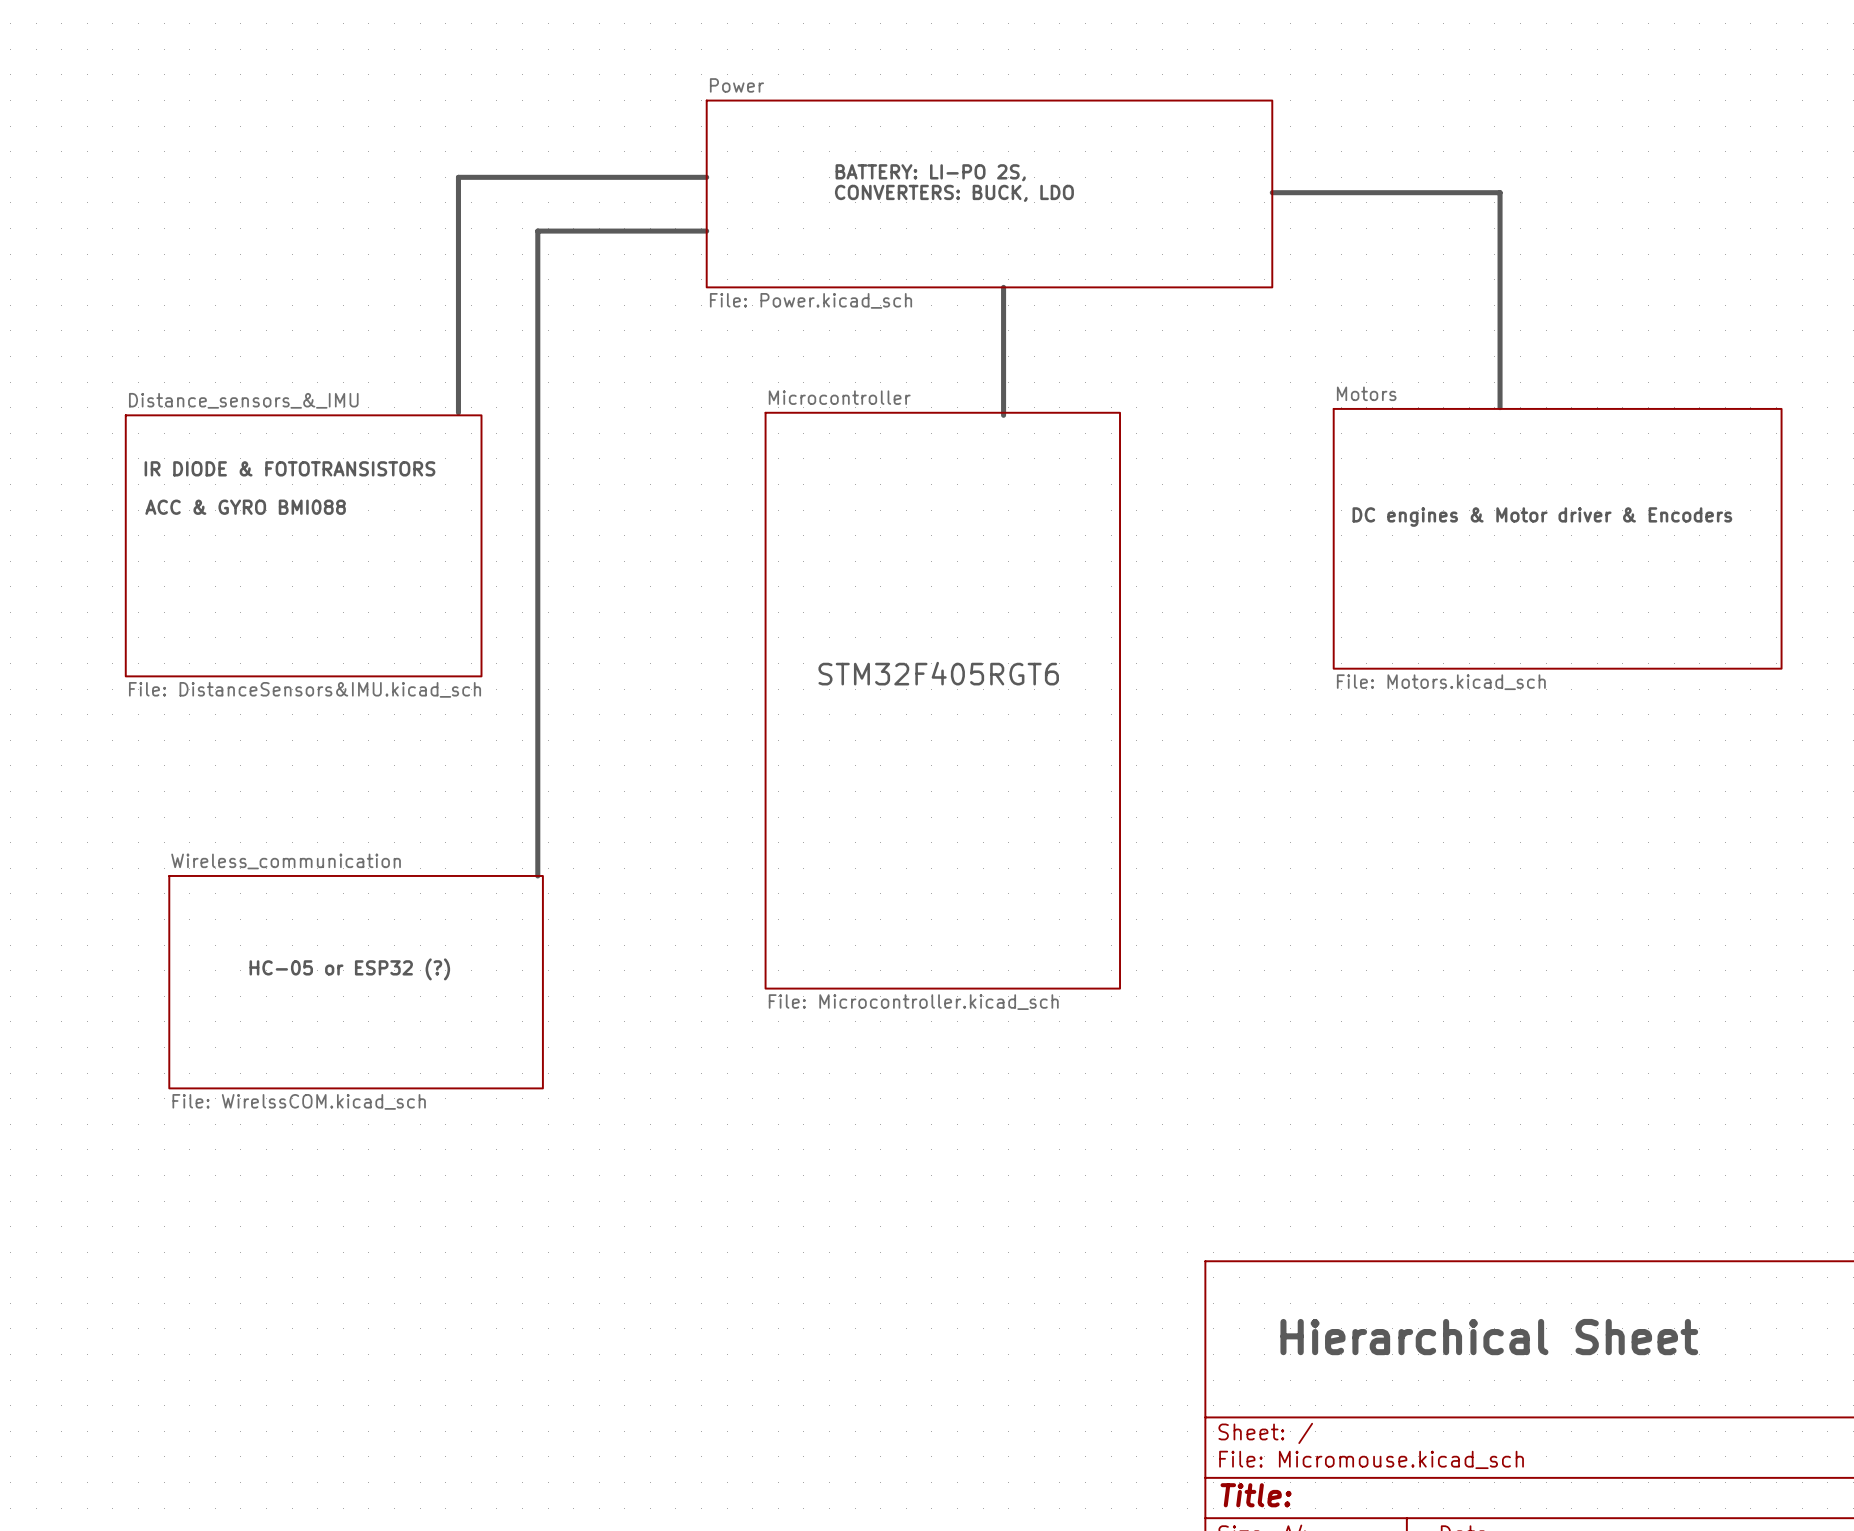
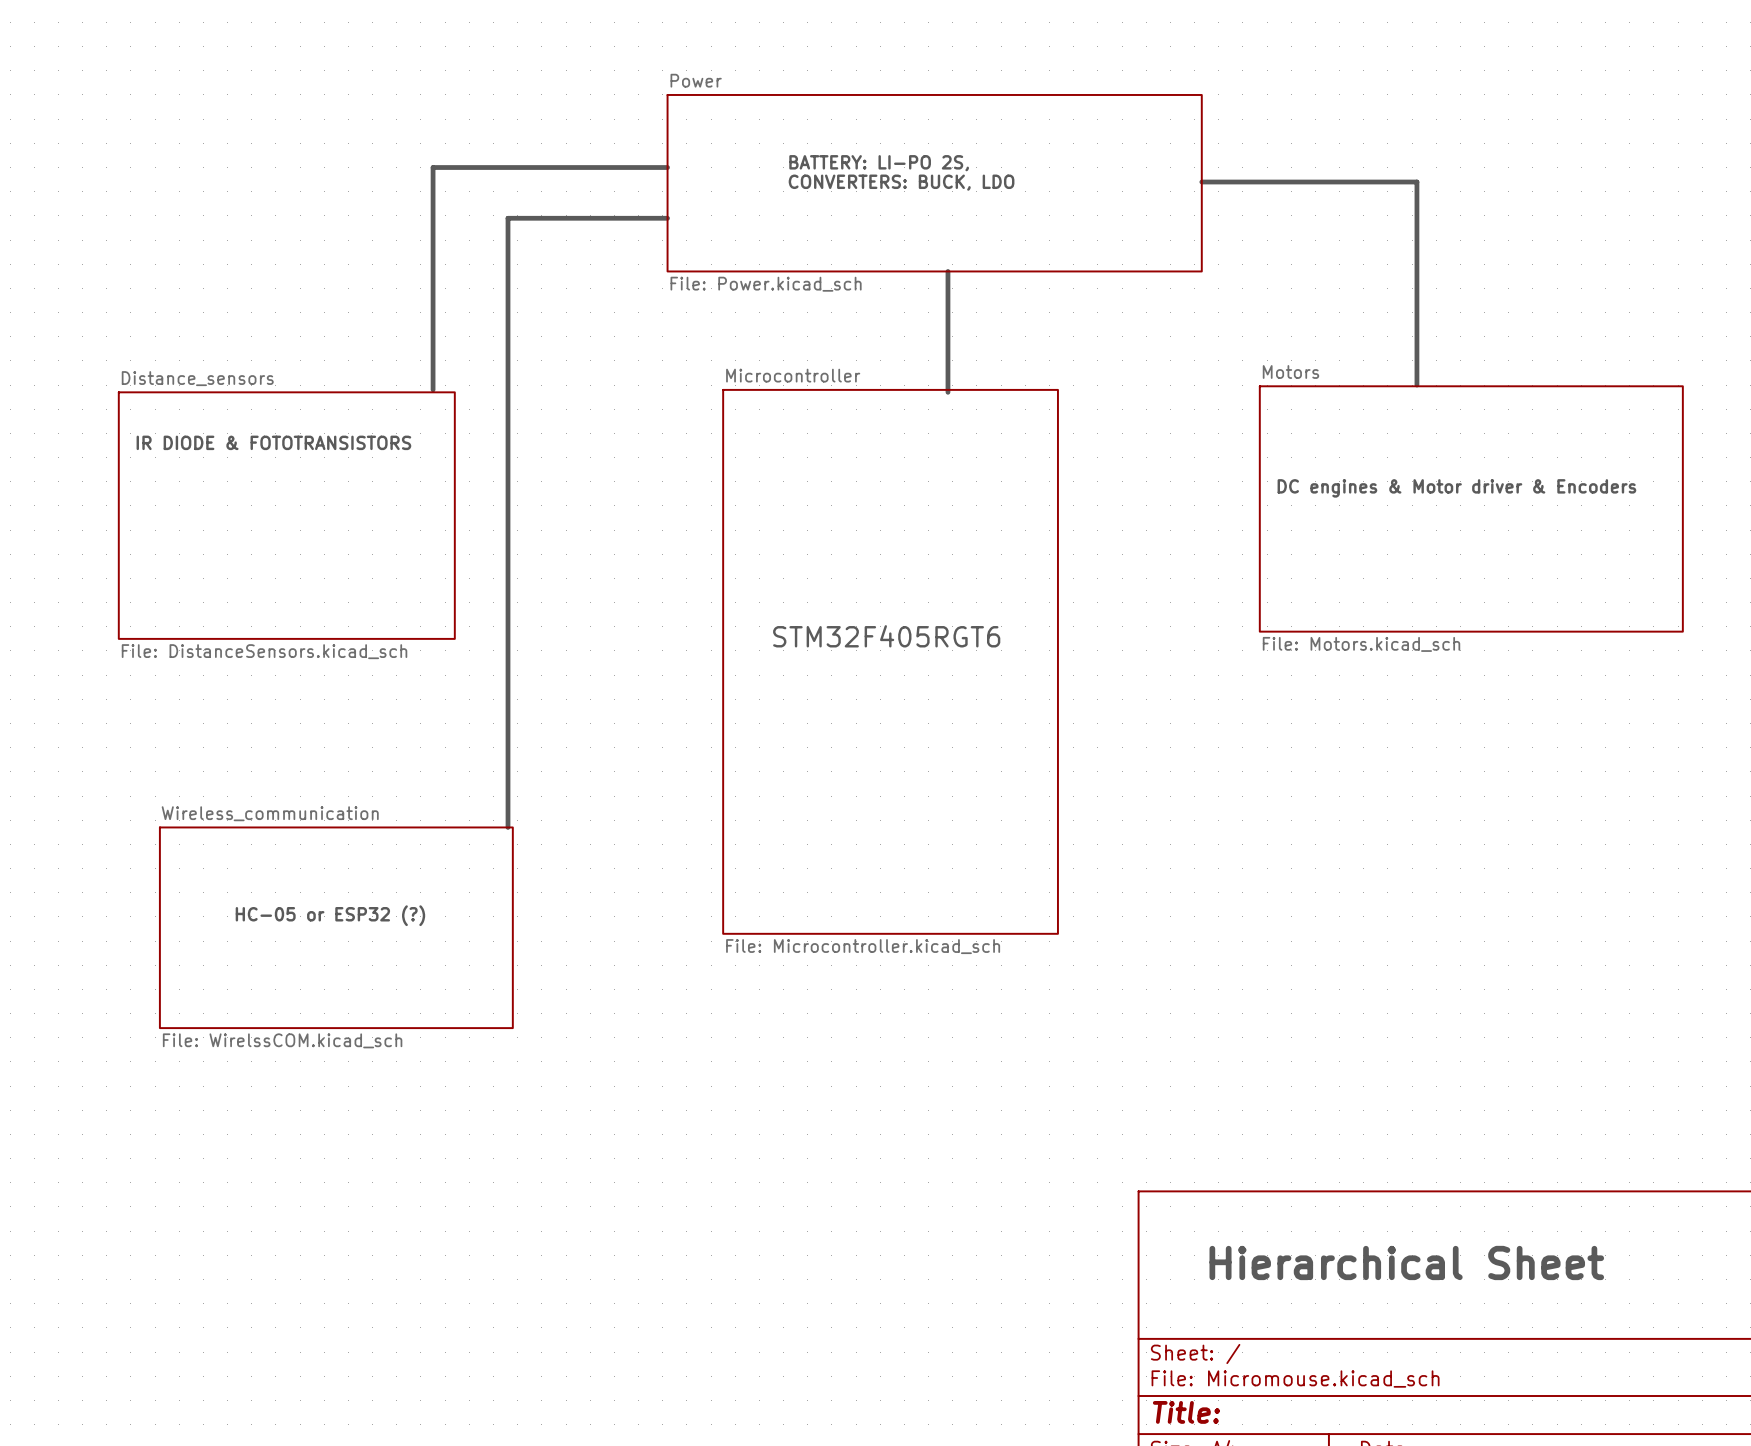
sheet Distance_sensors_&_IMU name: Distance_sensors_&_IMU (243, 400) -> Distance_sensors (197, 378)
text: ACC & GYRO BMI088 (245, 507) -> none
sheet Distance_sensors_&_IMU value: File: DistanceSensors&IMU.kicad_sch (305, 689) -> File: DistanceSensors.kicad_sch (264, 651)

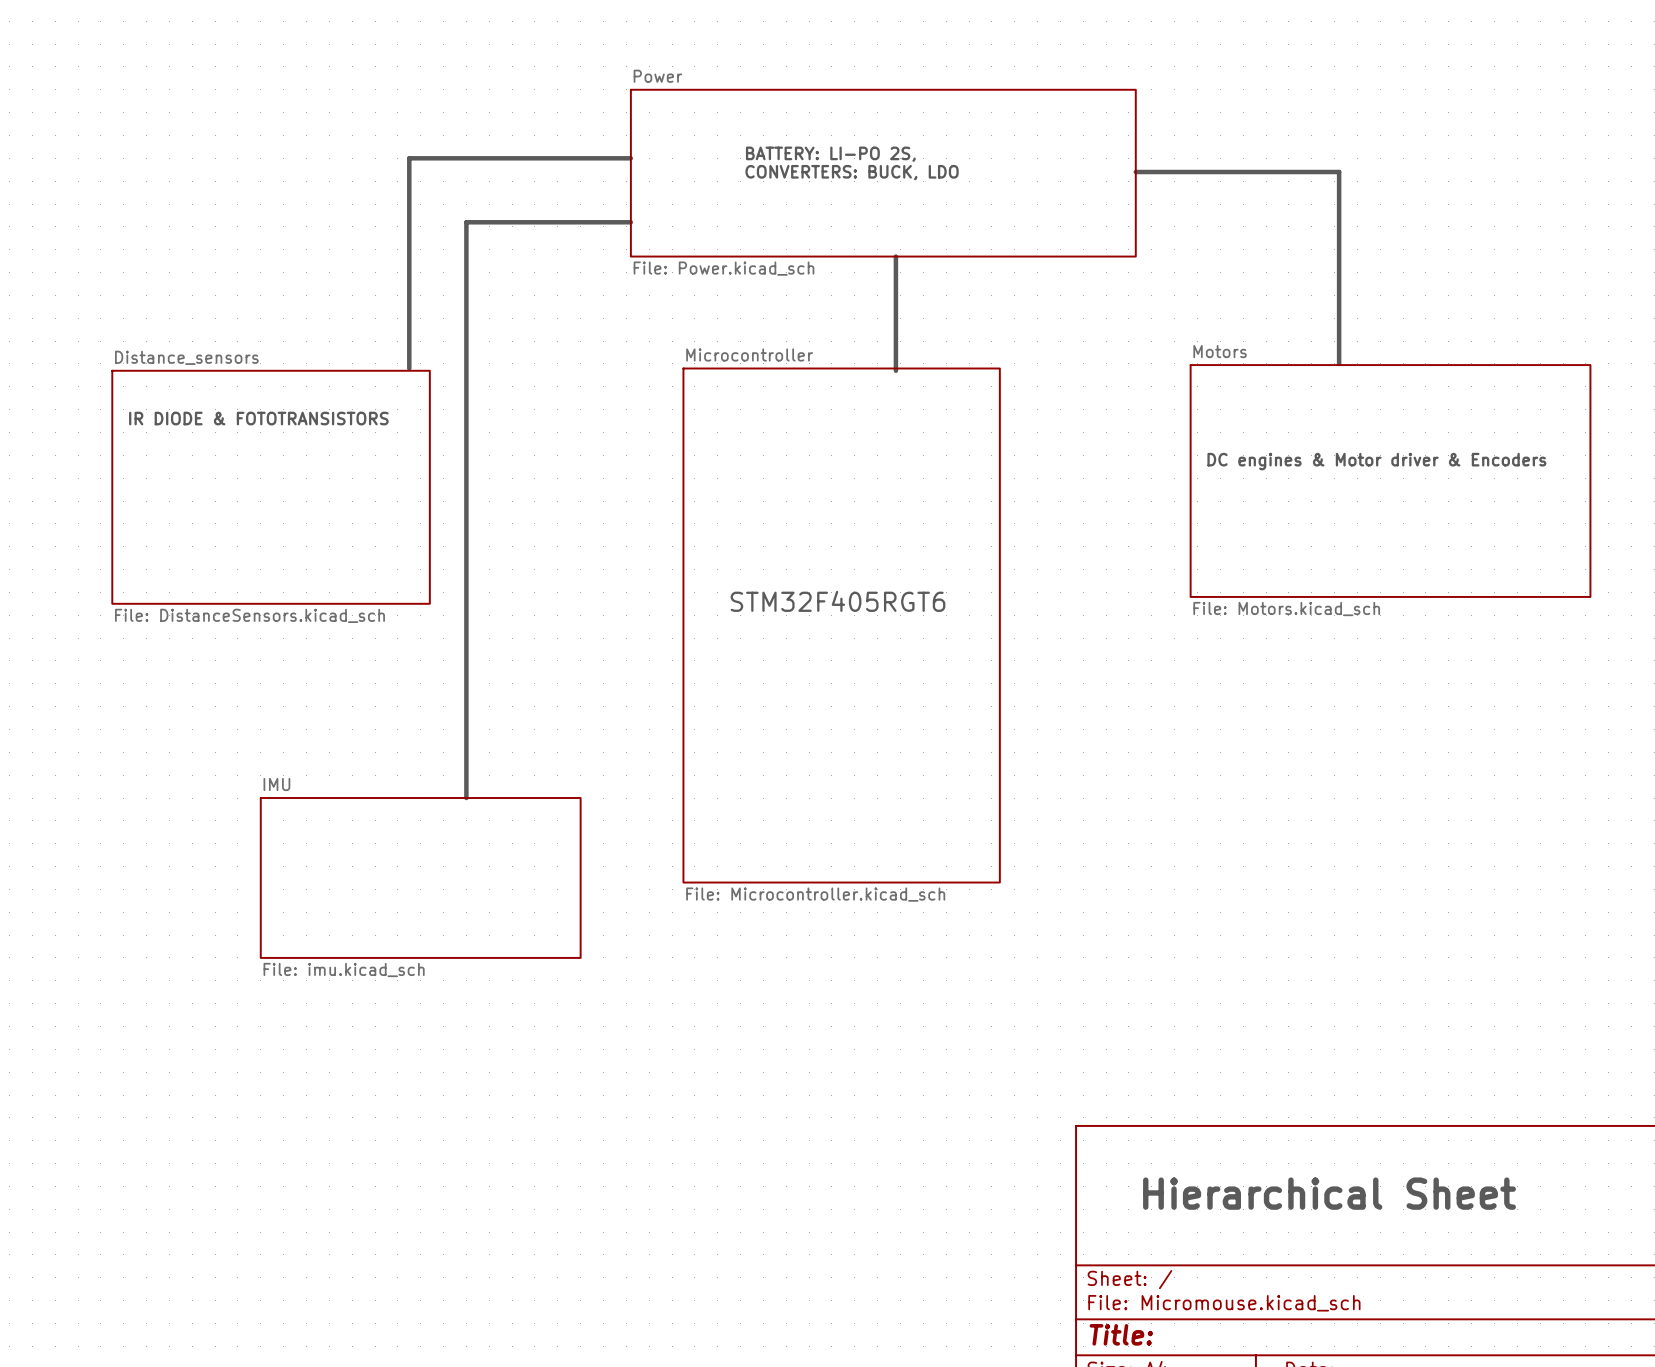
line: (667, 218) (508, 218) (508, 827) -> none
line: none -> (630, 222) (466, 222) (466, 798)
text: HC-05 or ESP32 (?) (330, 915) -> none
sheet Wireless_communication: File: WirelssCOM.kicad_sch (336, 927) -> none
sheet IMU: none -> File: imu.kicad_sch (420, 877)

